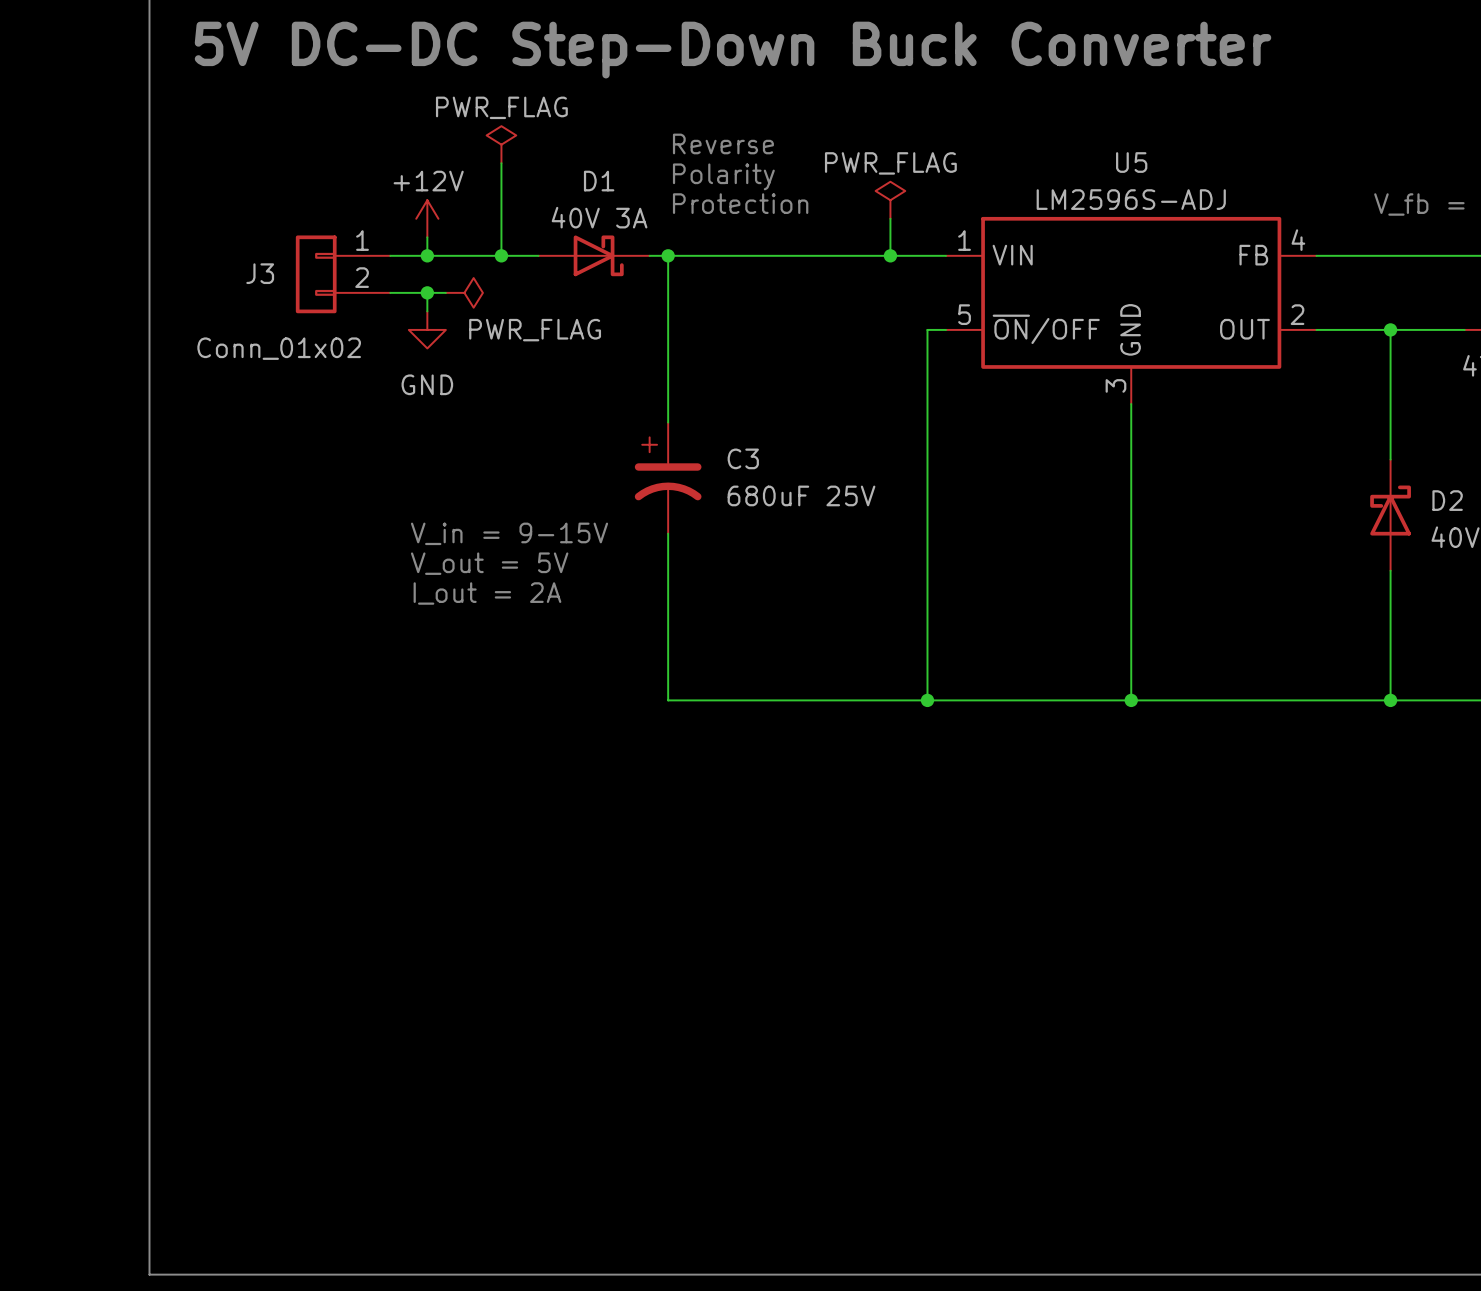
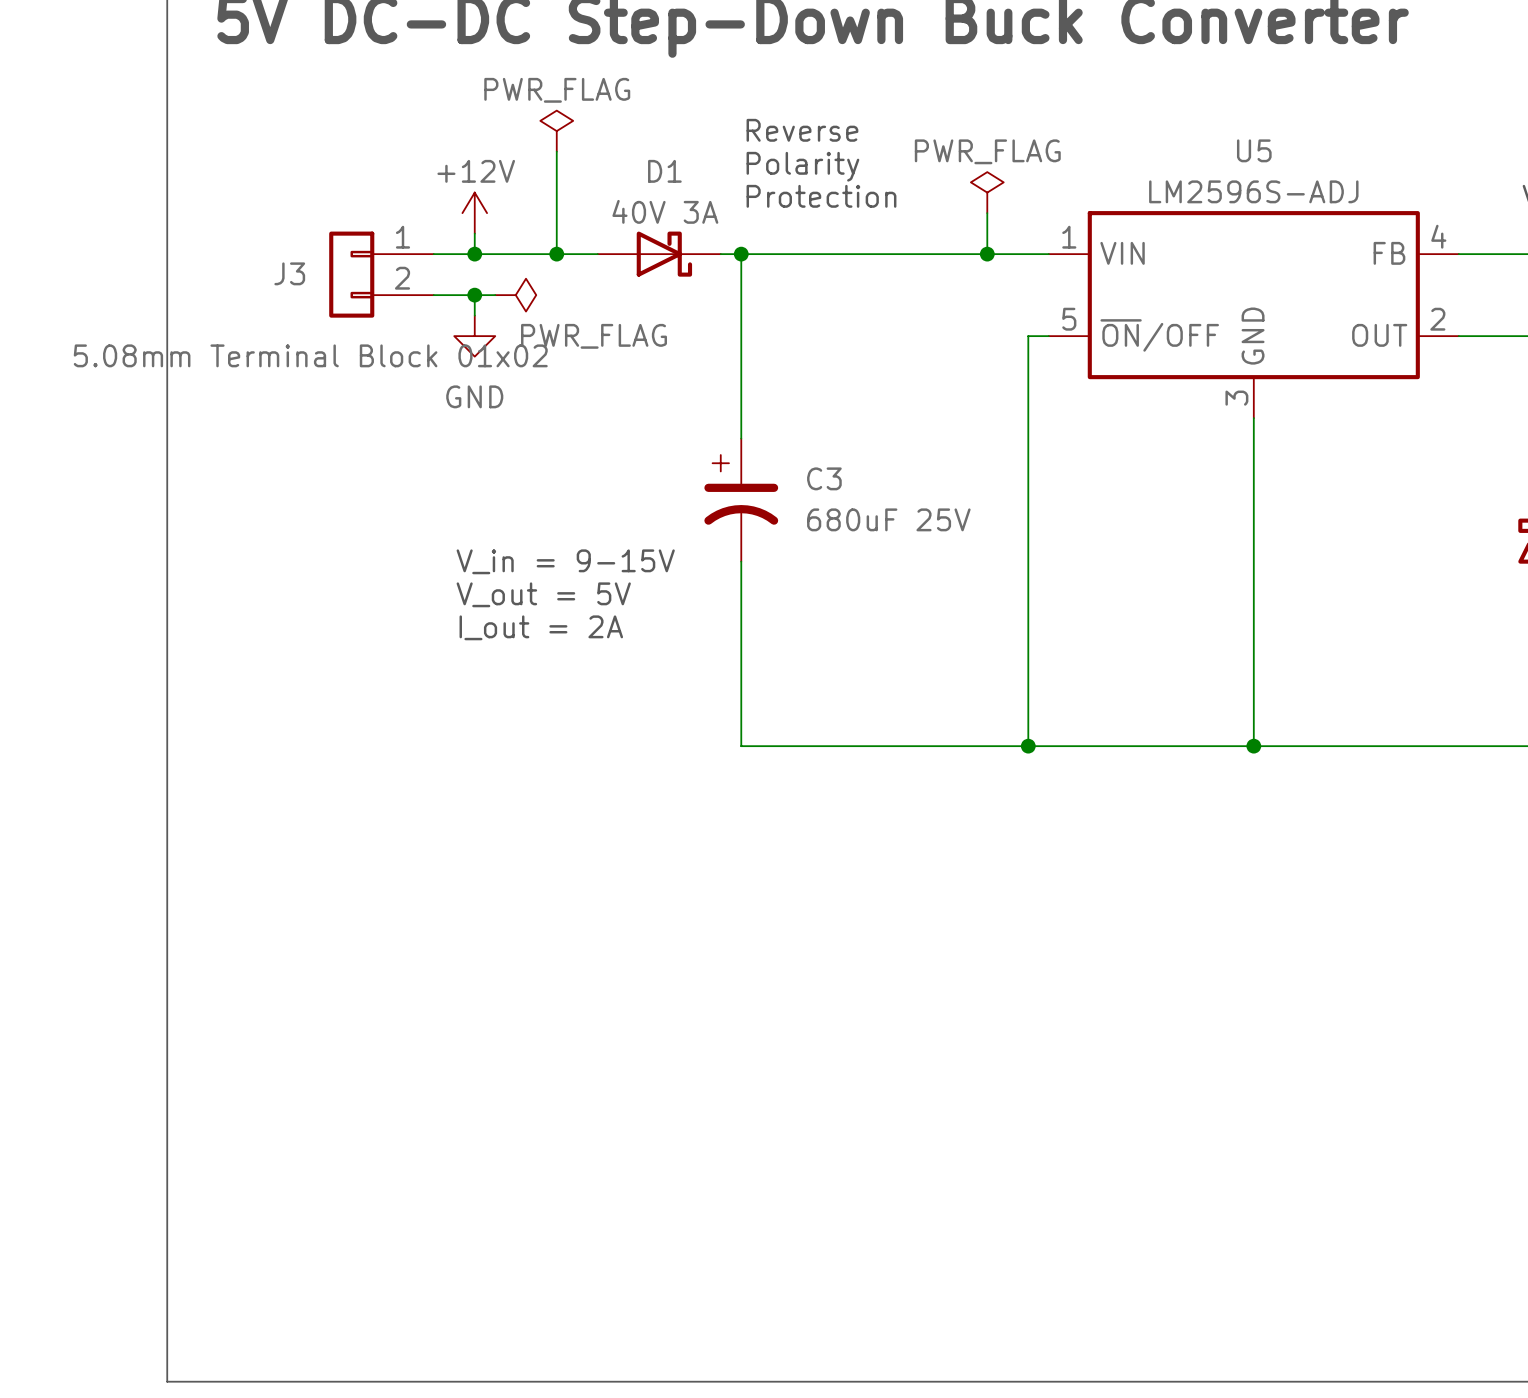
J3 value: Conn_01x02 (279, 348) -> 5.08mm Terminal Block 01x02 (310, 355)

